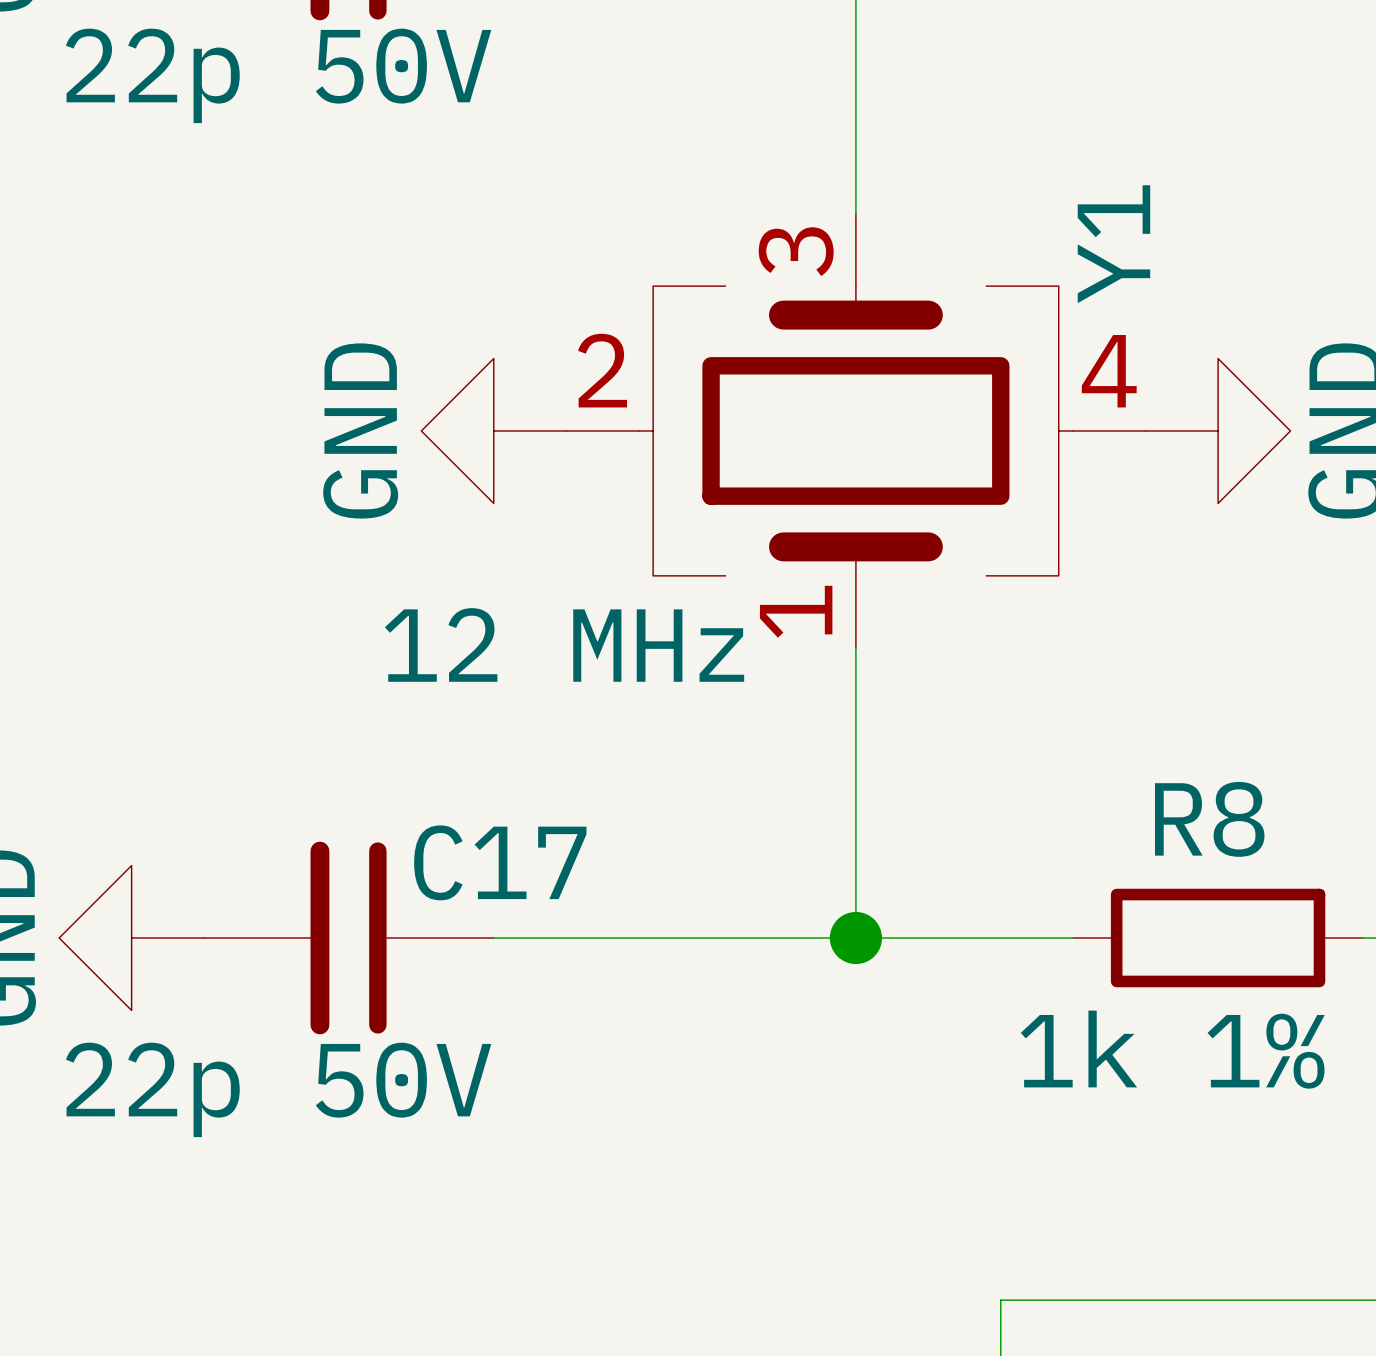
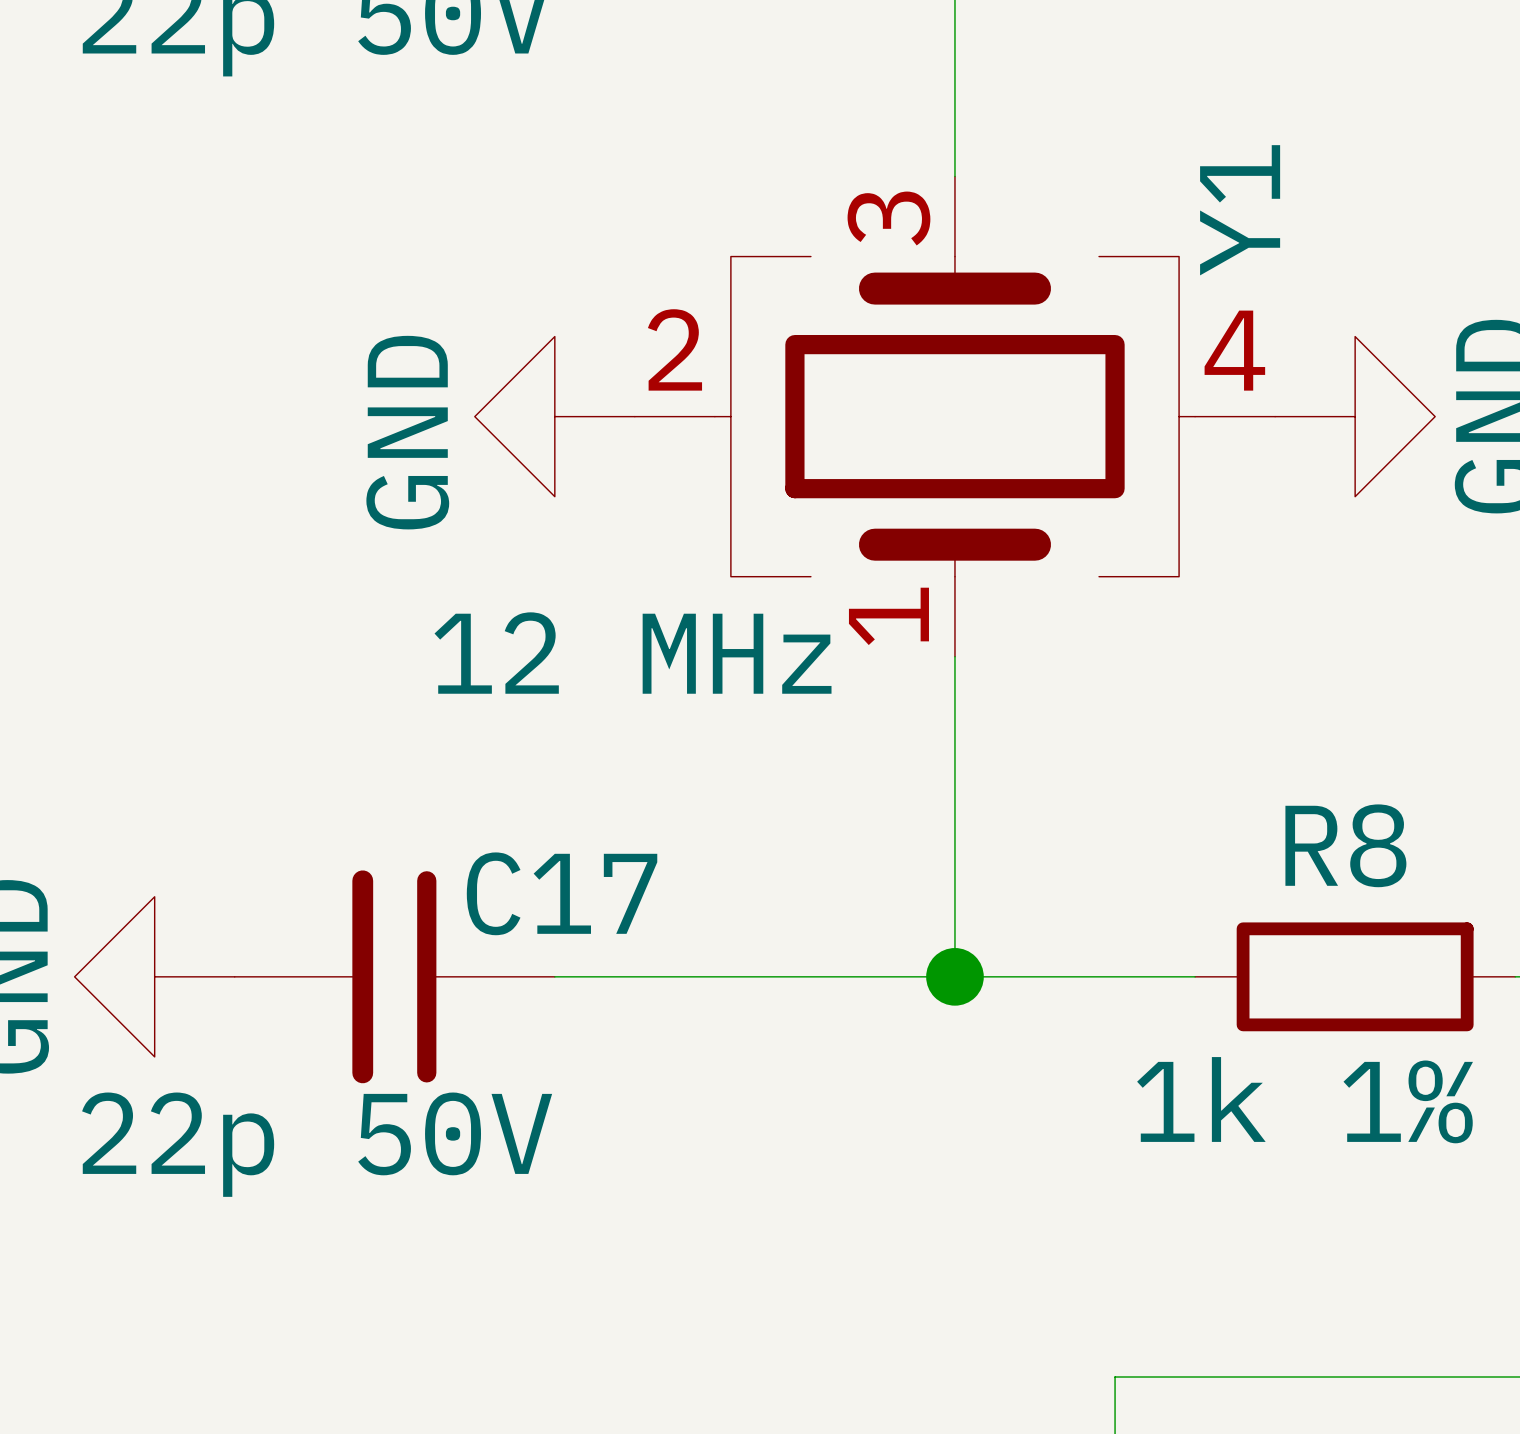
power symbol text position: GND (360, 430) -> GND (407, 432)

